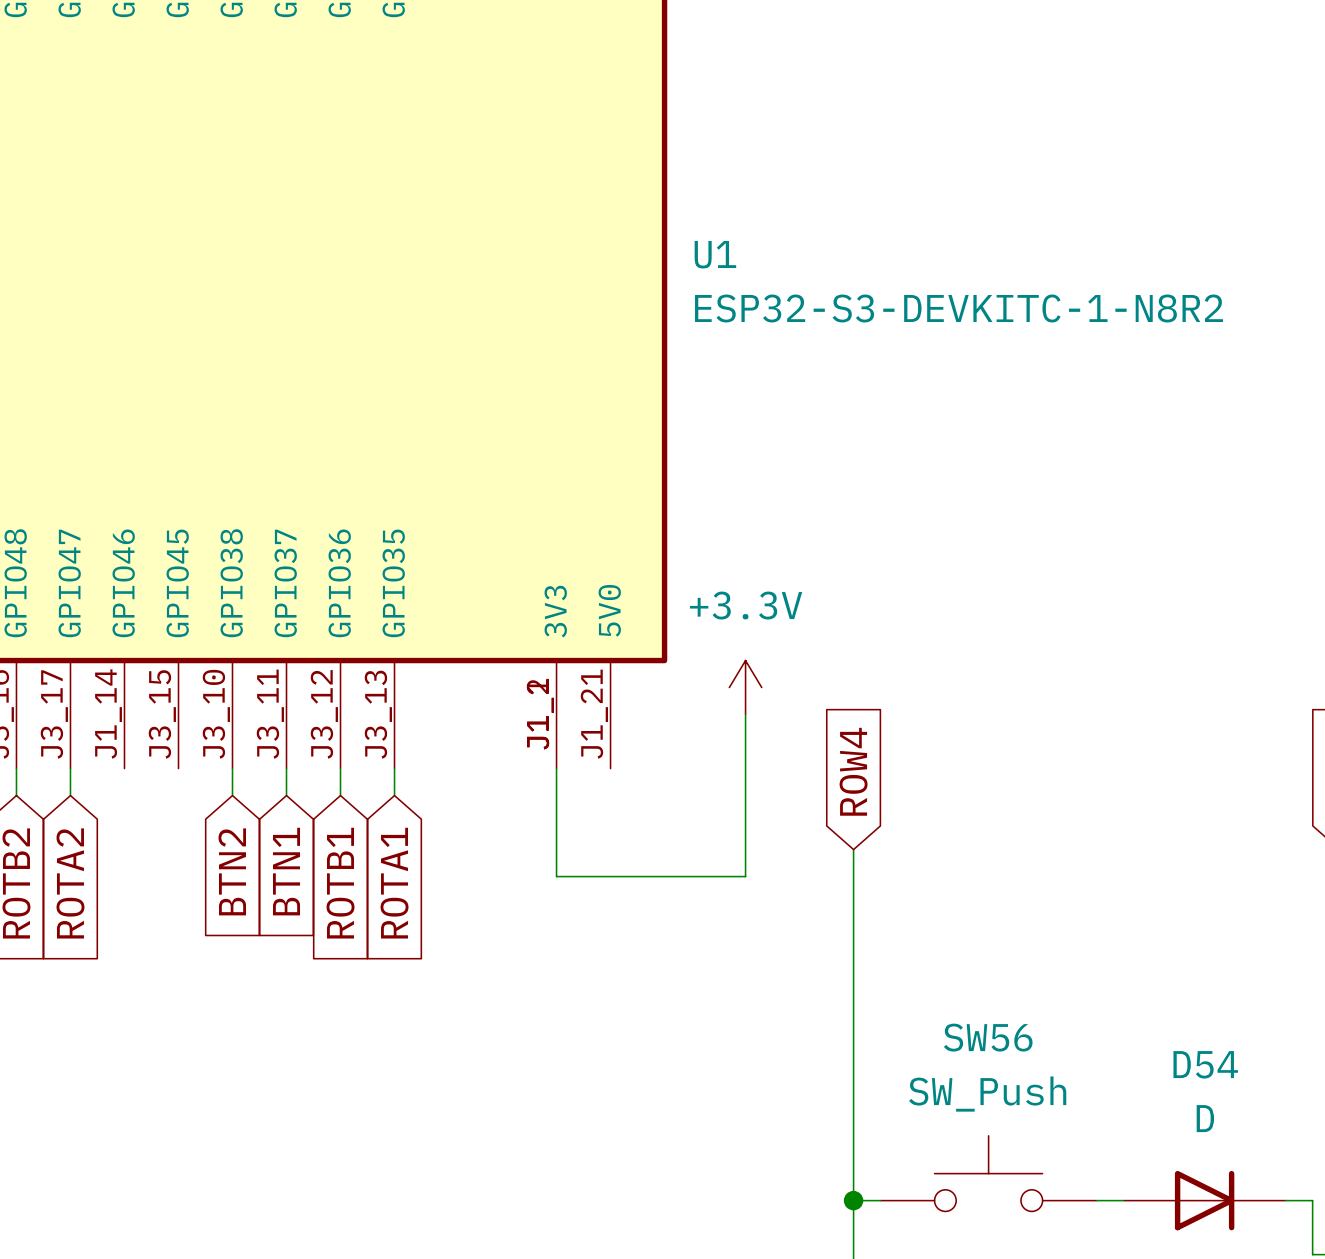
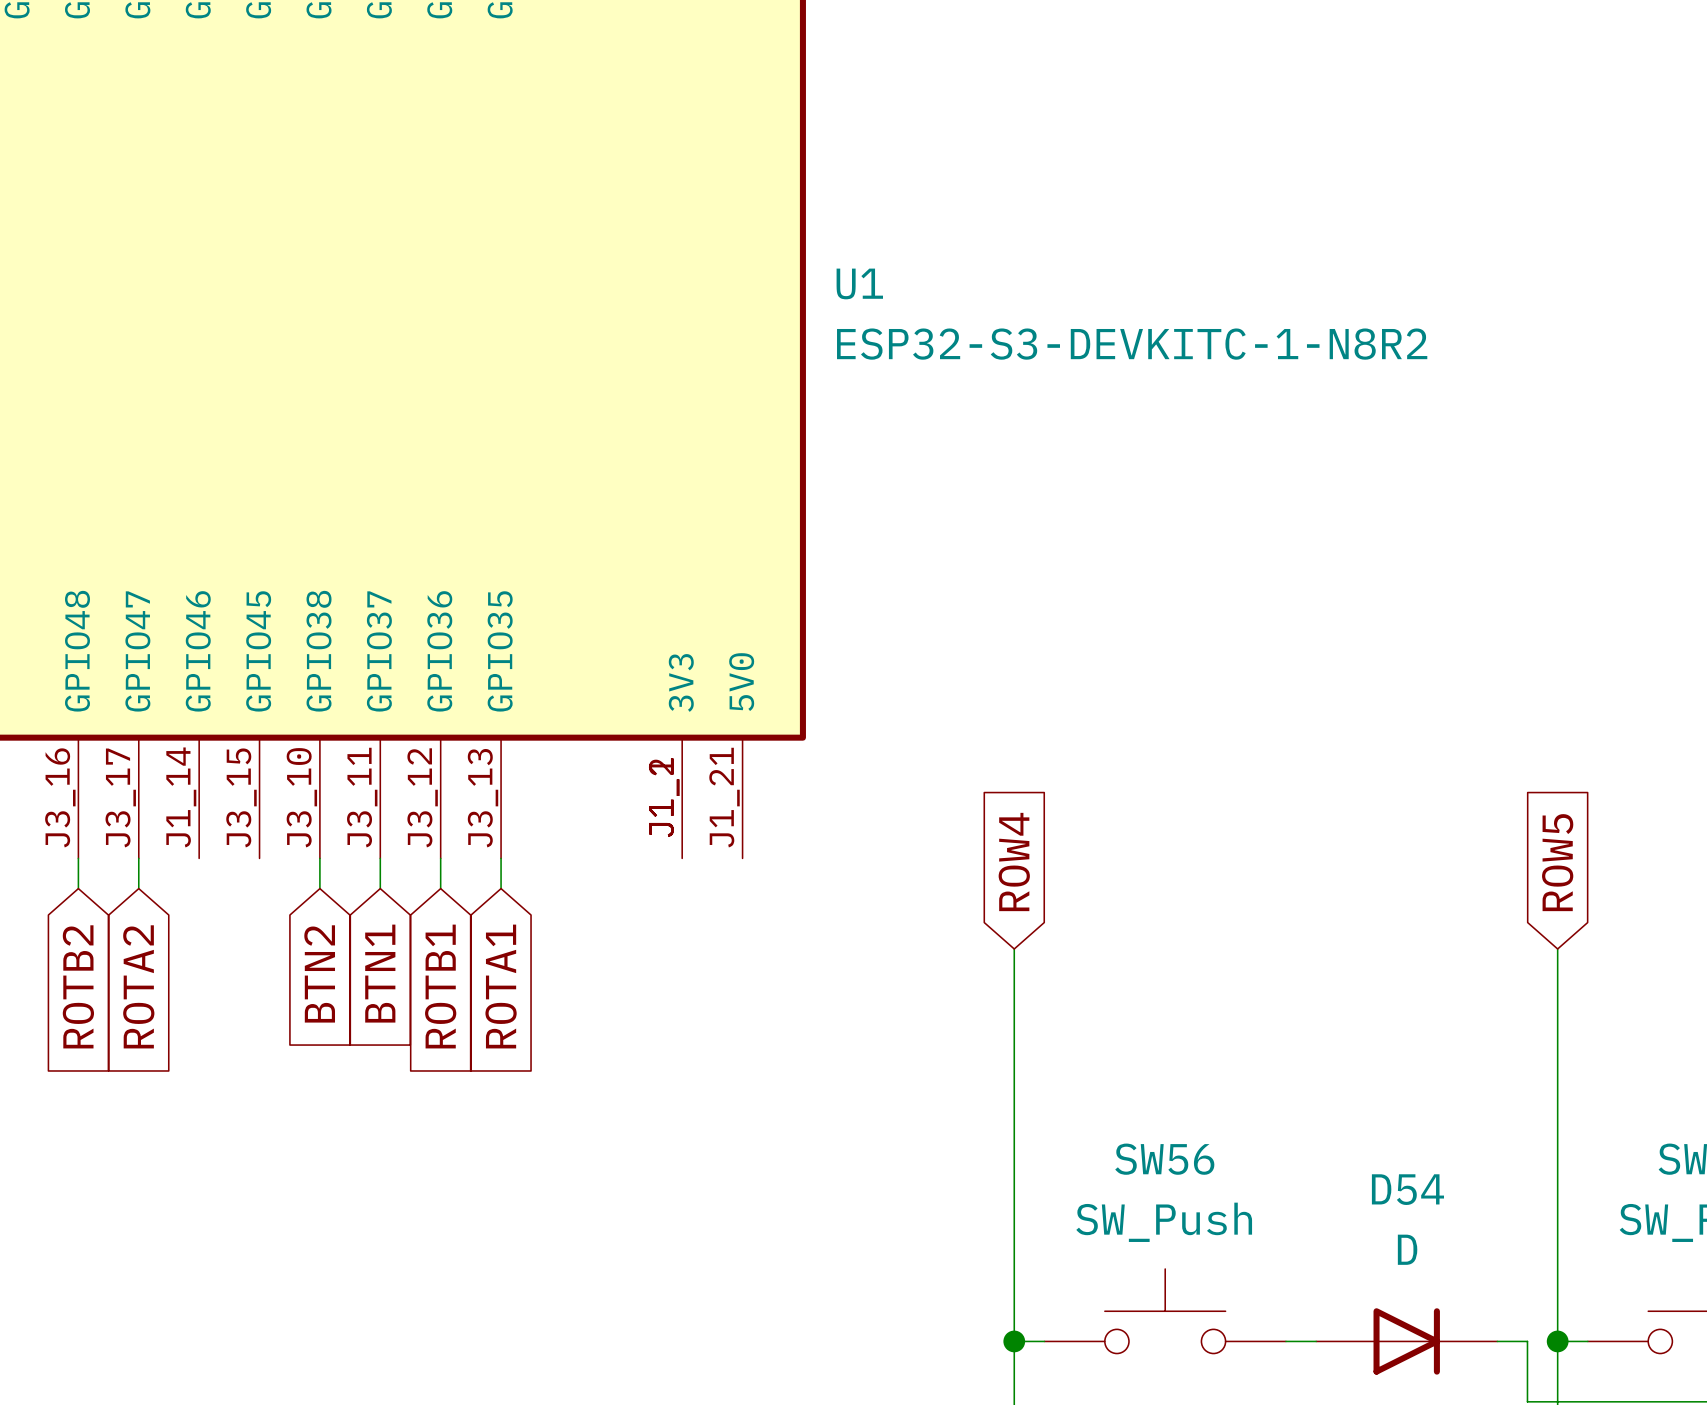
power symbol: +3.3V (745, 687) -> none
wire: (745, 714) (745, 876) (556, 876) (556, 768) -> none

